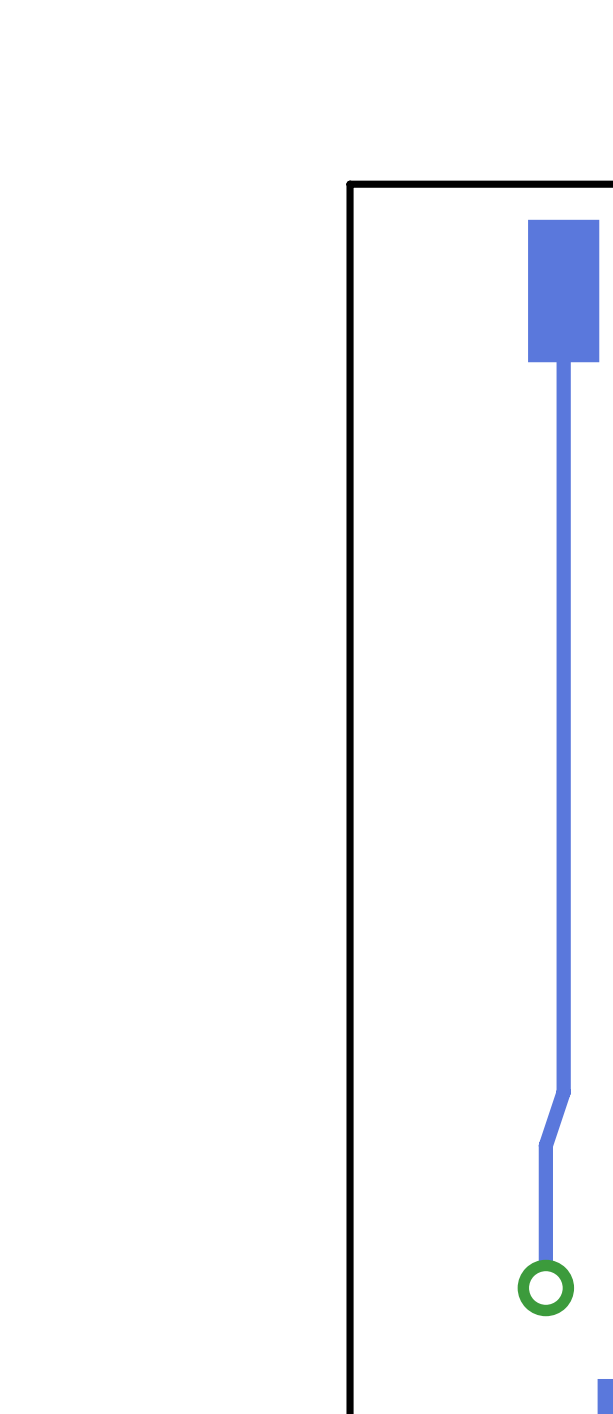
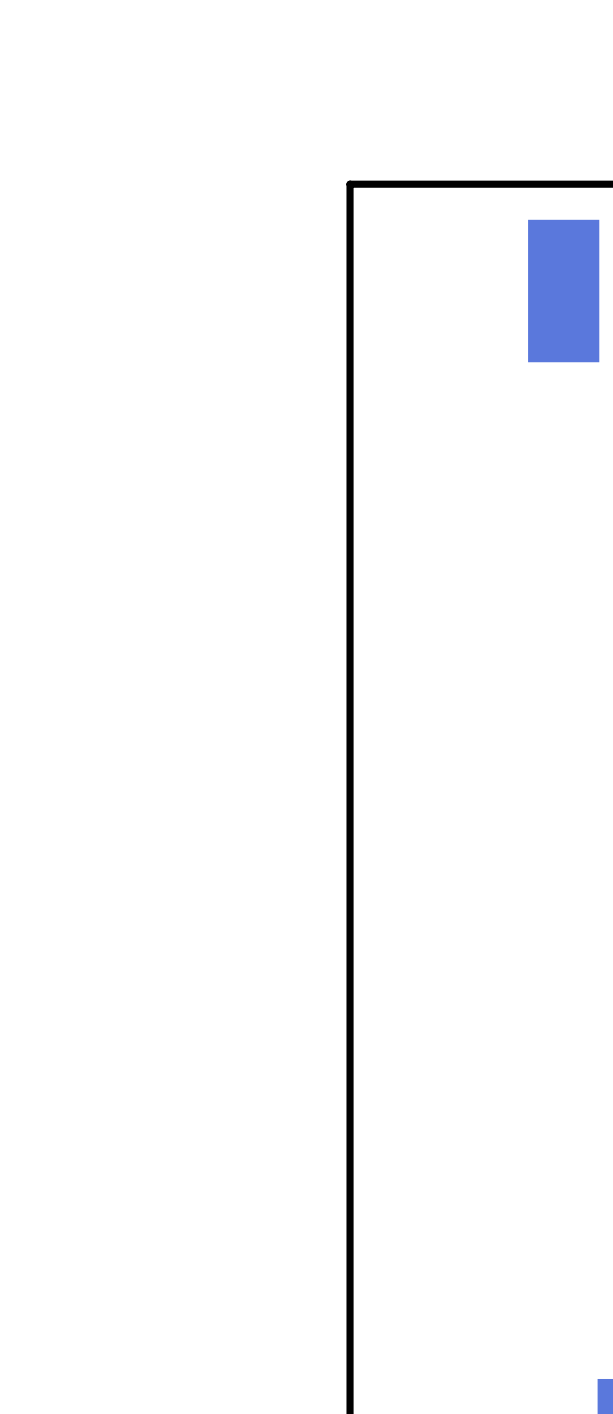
track: (563, 291) (563, 1092) (545, 1145) (545, 1288) -> none
via: (545, 1288) -> none

